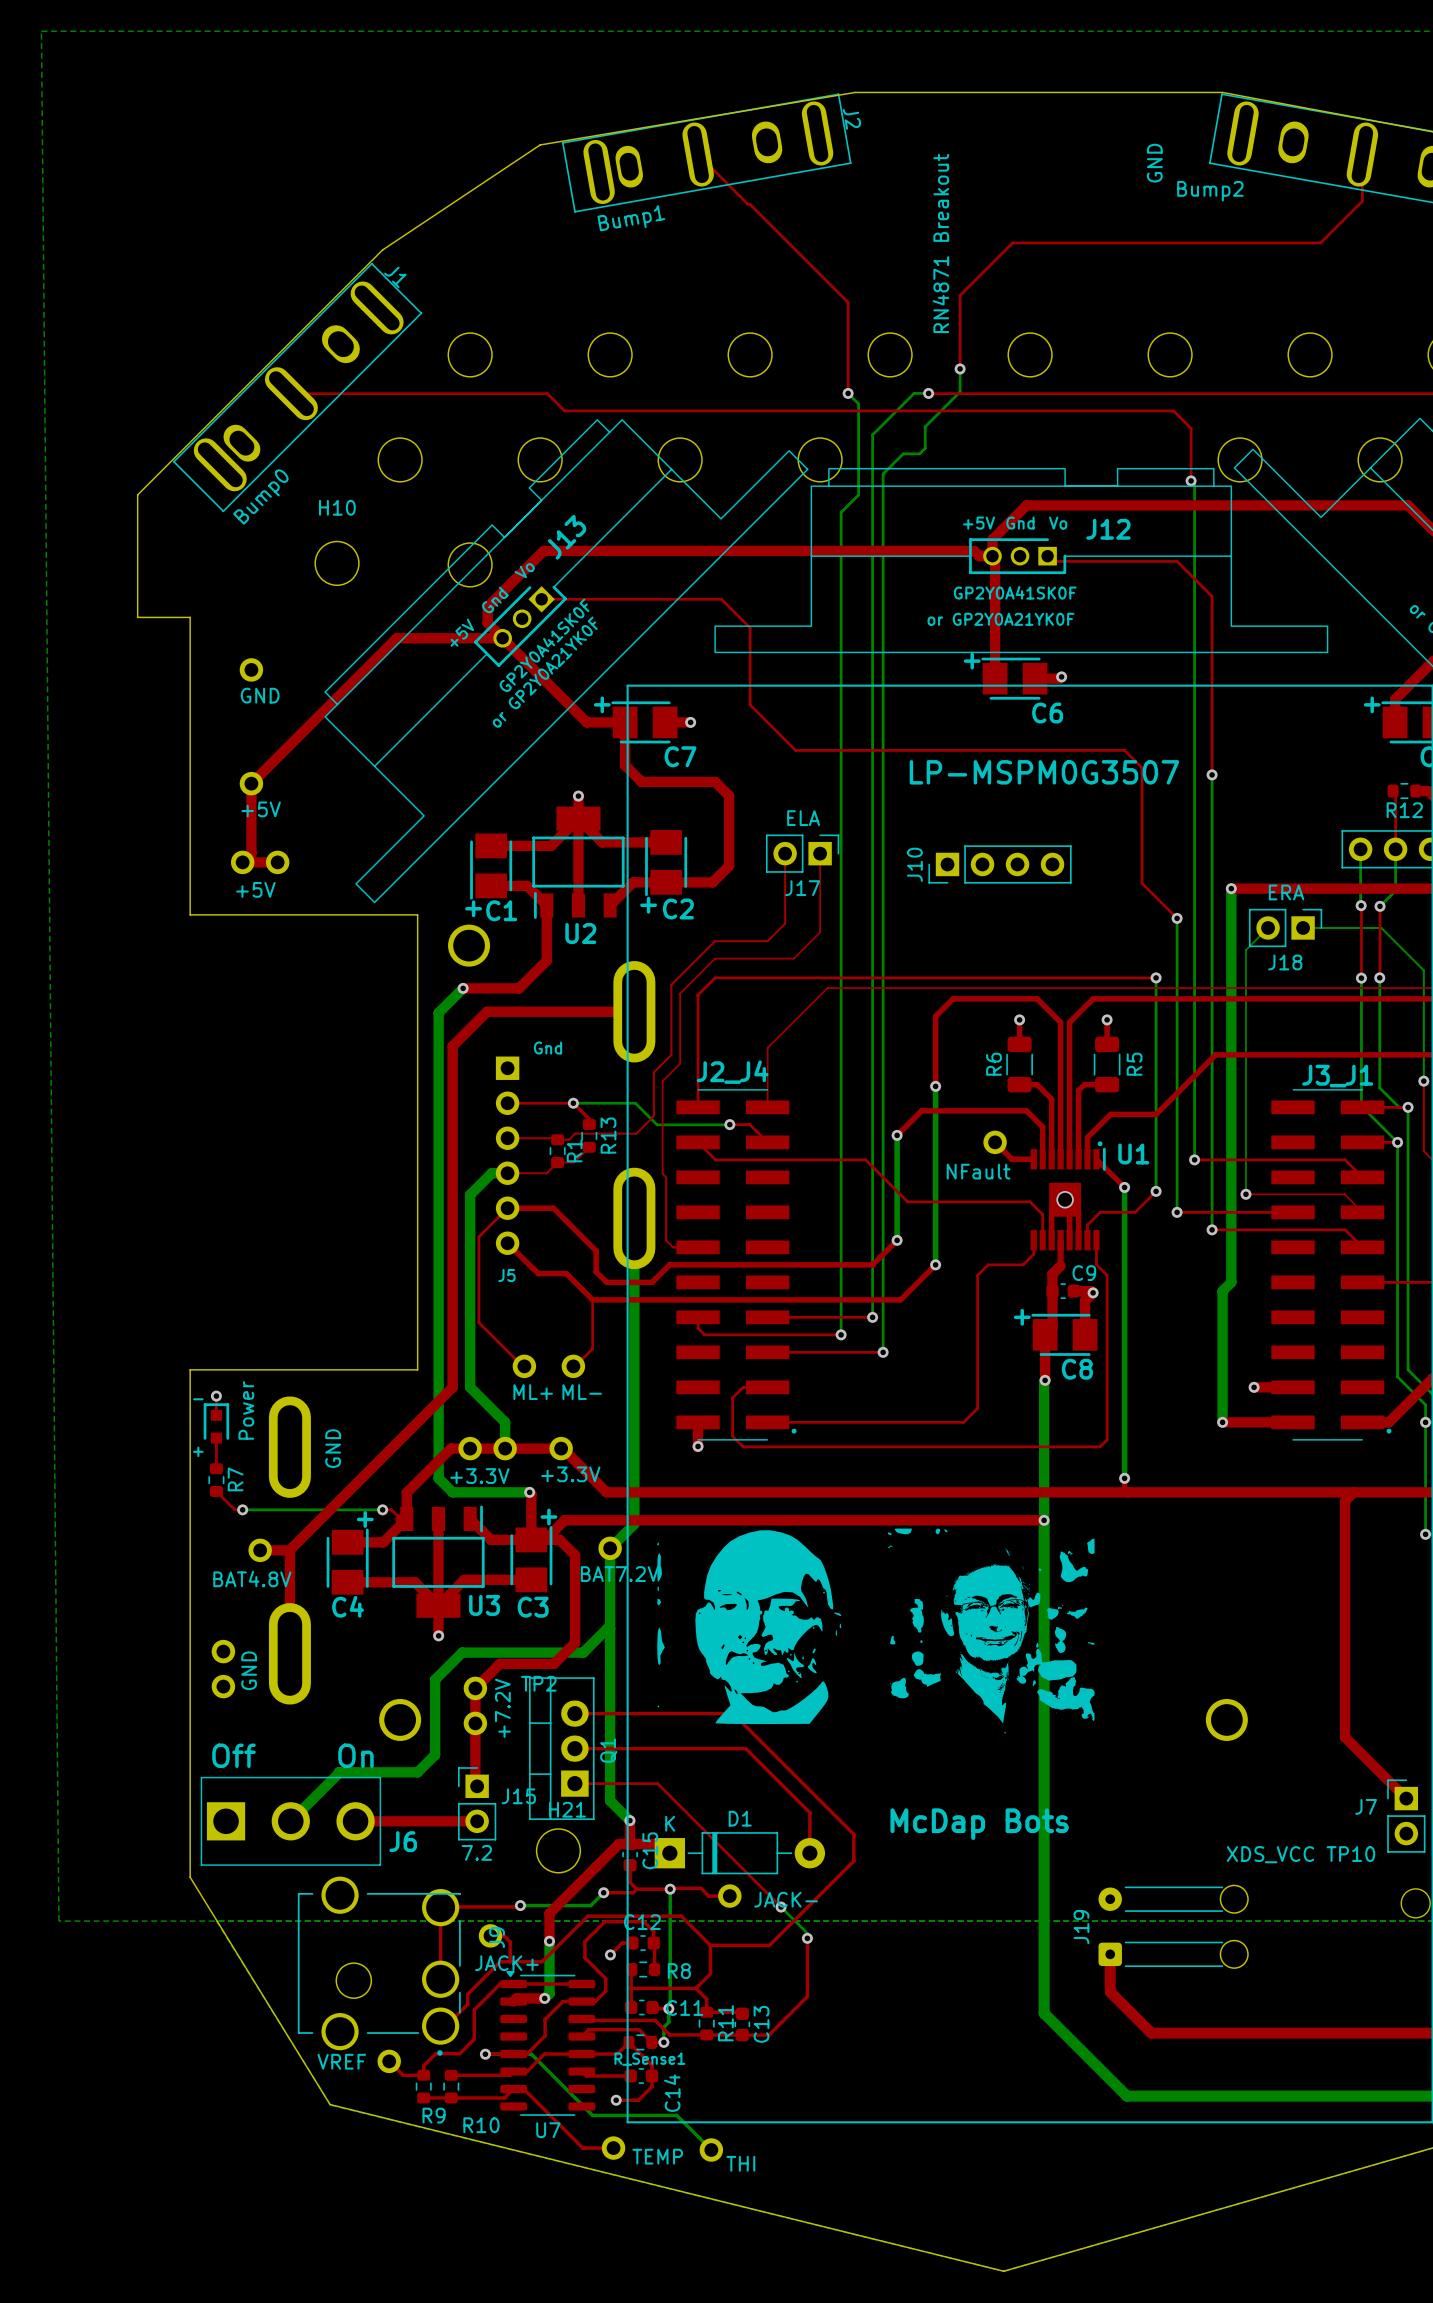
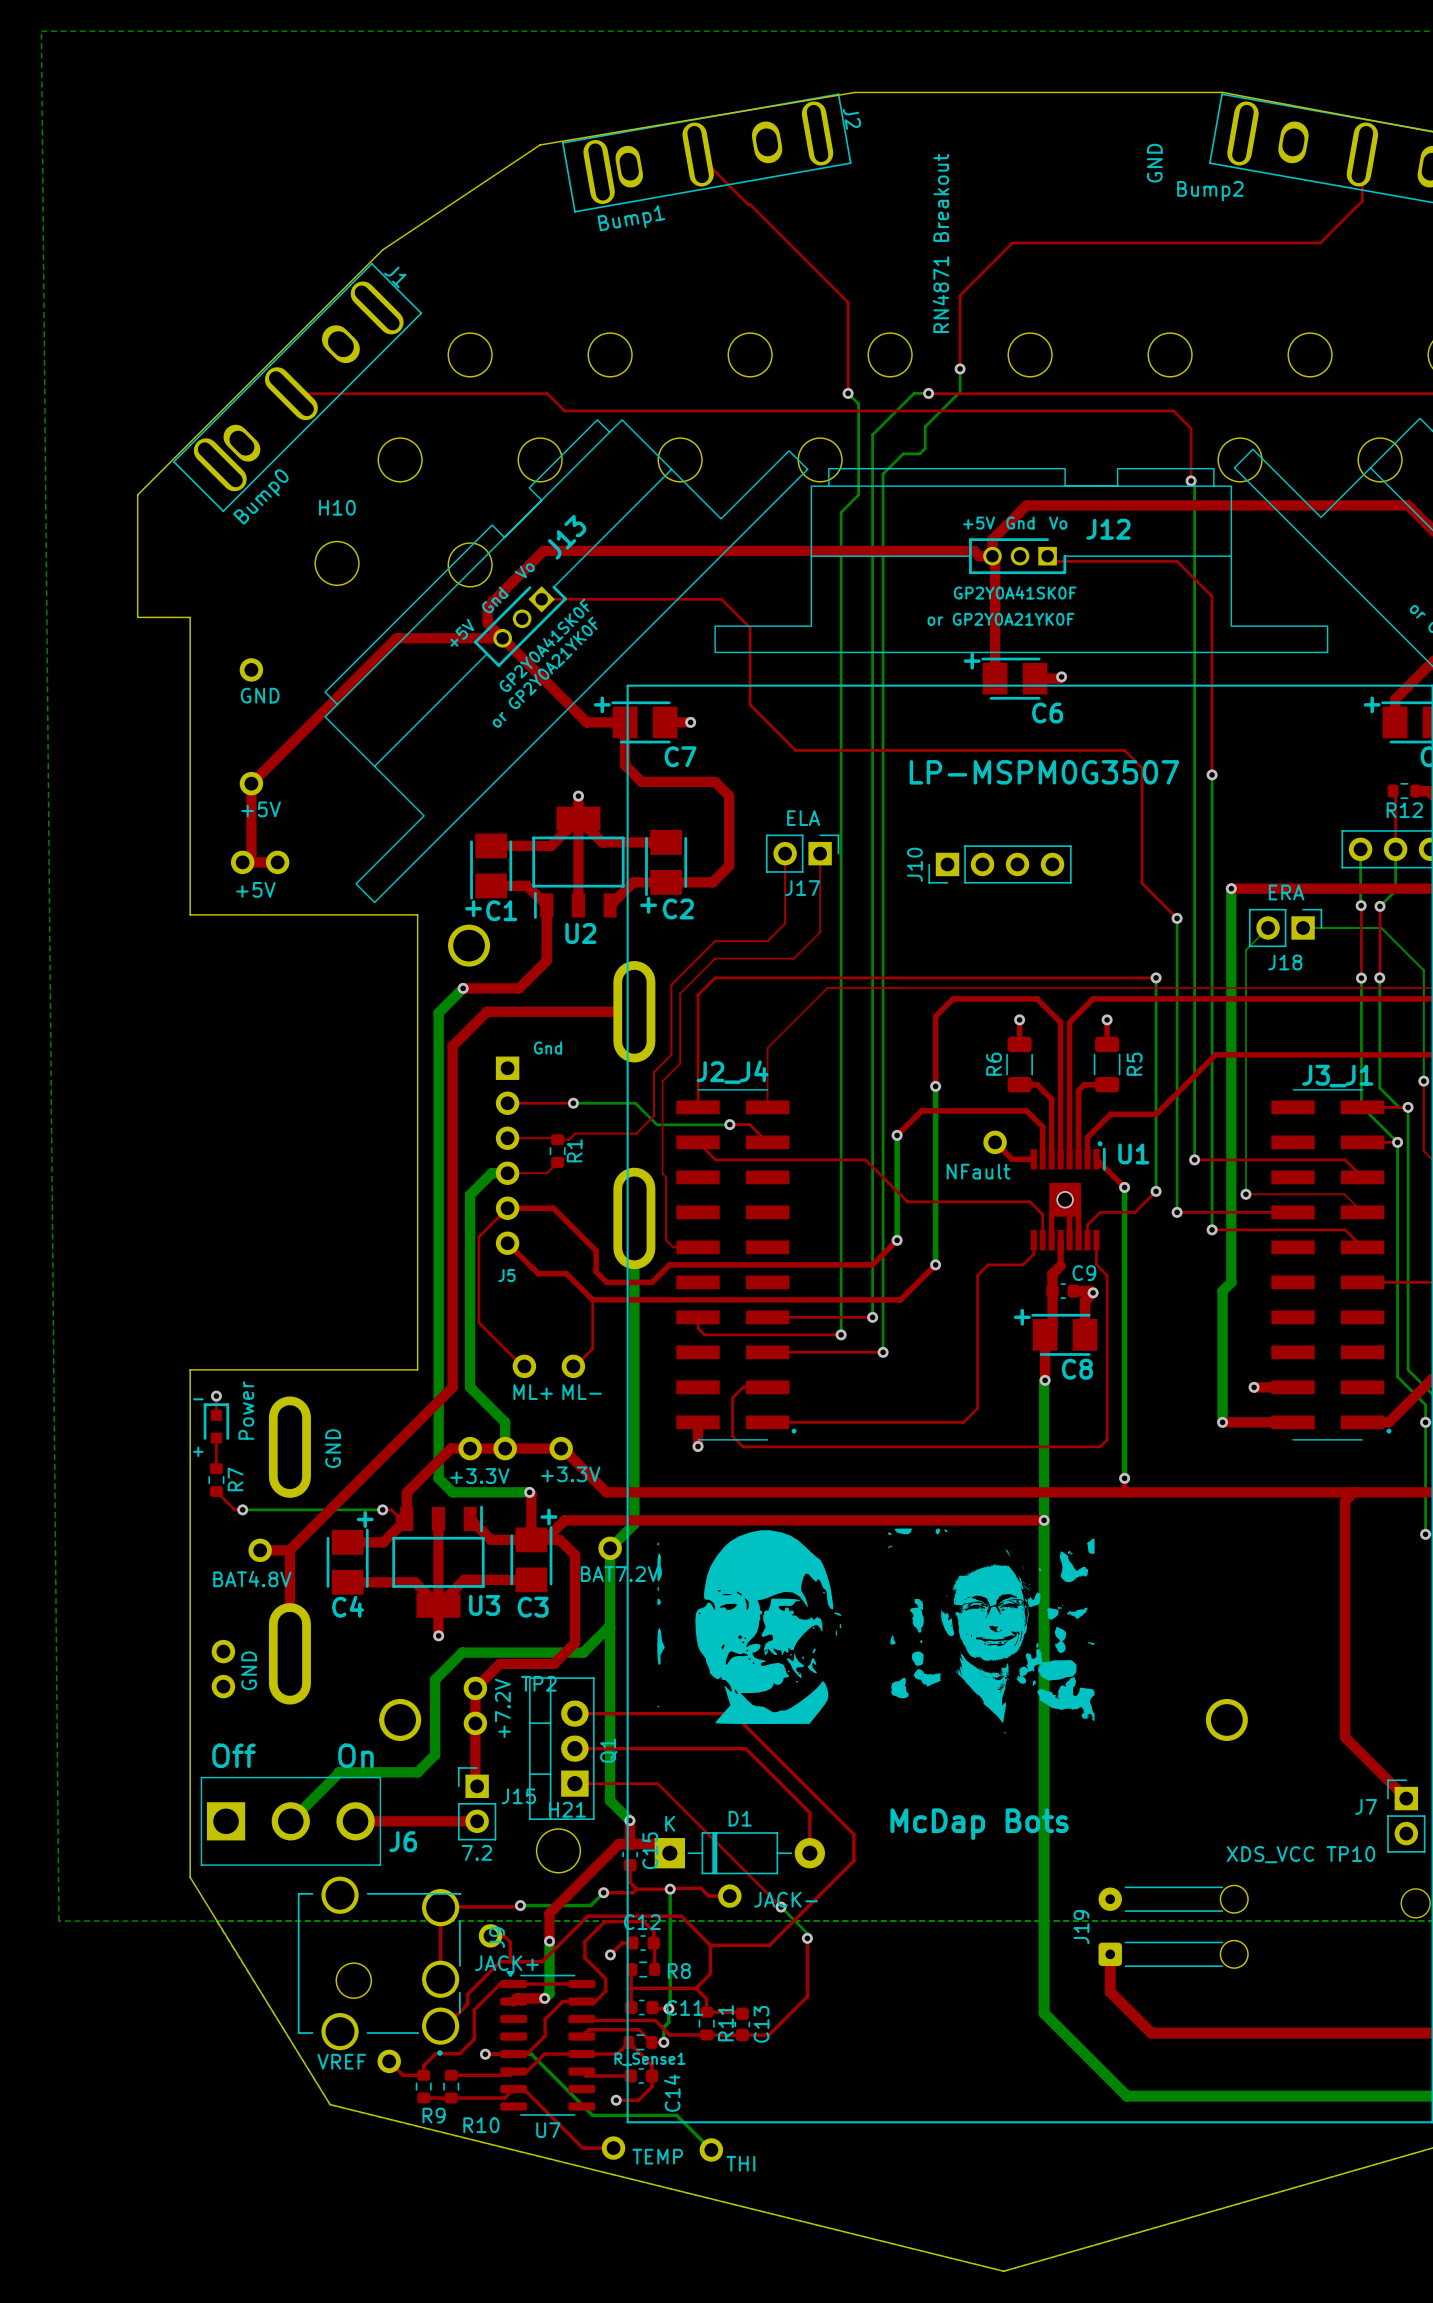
top track: (573, 1103) (589, 1119) (589, 1124) -> none
R13: (589, 1135) -> none
top track: (589, 1147) (574, 1162) (557, 1162) -> none

